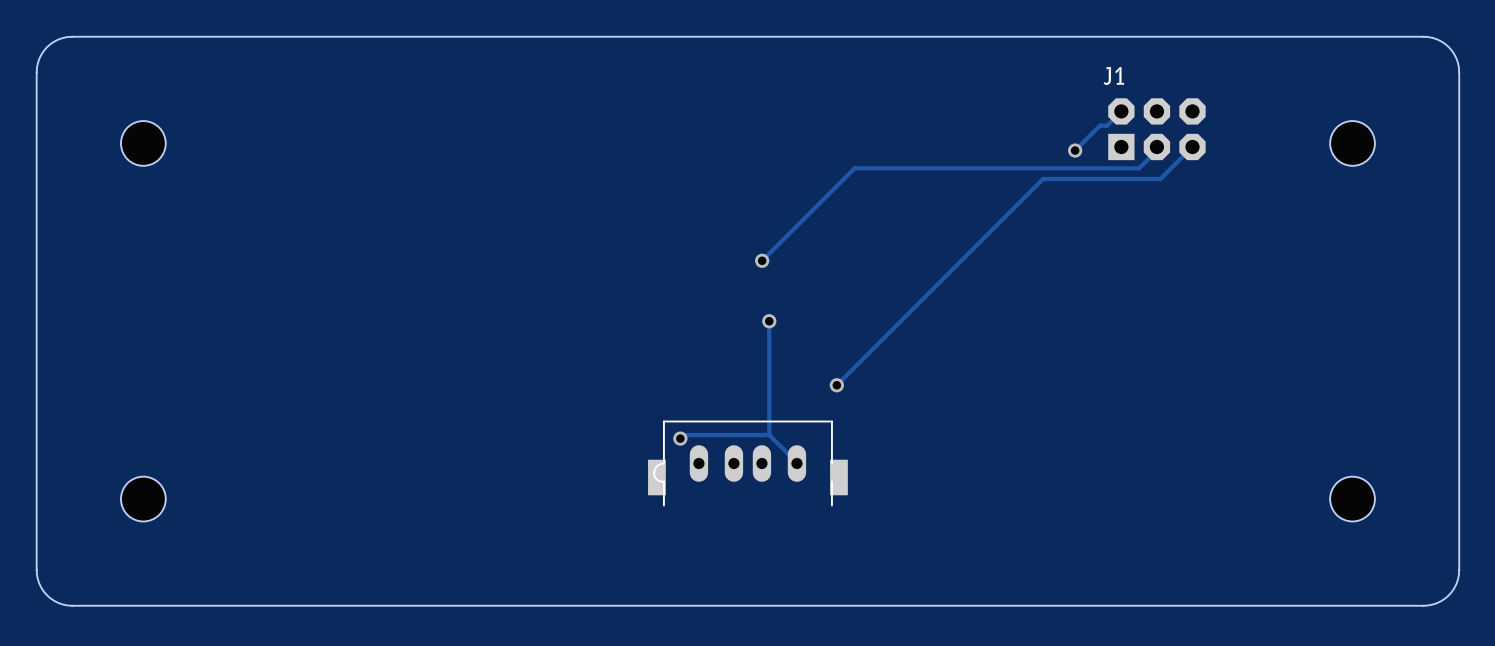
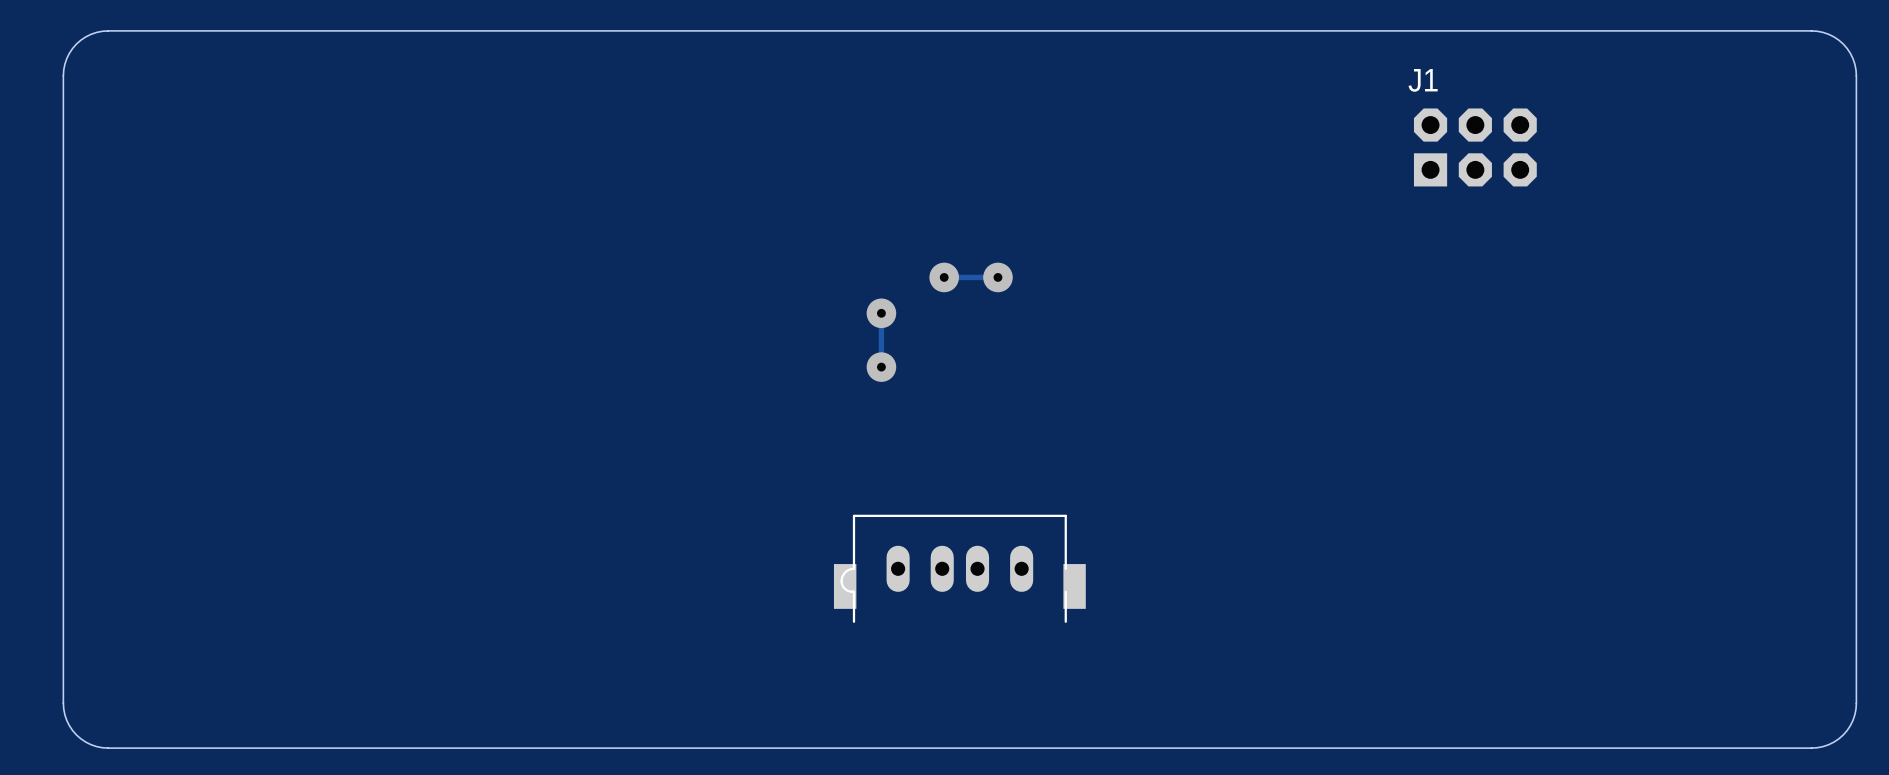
track: (1121, 111) (1107, 125) (1100, 125) (1075, 150) -> none
hole: (143, 143) -> none
hole: (1352, 143) -> none
track: (1156, 146) (1156, 150) (1139, 168) (854, 168) (762, 260) -> none
track: (1192, 146) (1160, 179) (1043, 179) (836, 385) -> none
via: (1075, 150) -> none
via: none -> (944, 277)
track: none -> (997, 277) (944, 277)
via: none -> (997, 277)
track: none -> (881, 313) (881, 367)
via: none -> (881, 313)
via: (762, 260) -> none
via: none -> (881, 367)
track: (769, 321) (769, 435) -> none
via: (769, 321) -> none
via: (836, 385) -> none
track: (769, 435) (683, 435) (680, 438) -> none
track: (769, 435) (796, 463) -> none
via: (680, 438) -> none
hole: (143, 499) -> none
hole: (1352, 499) -> none

